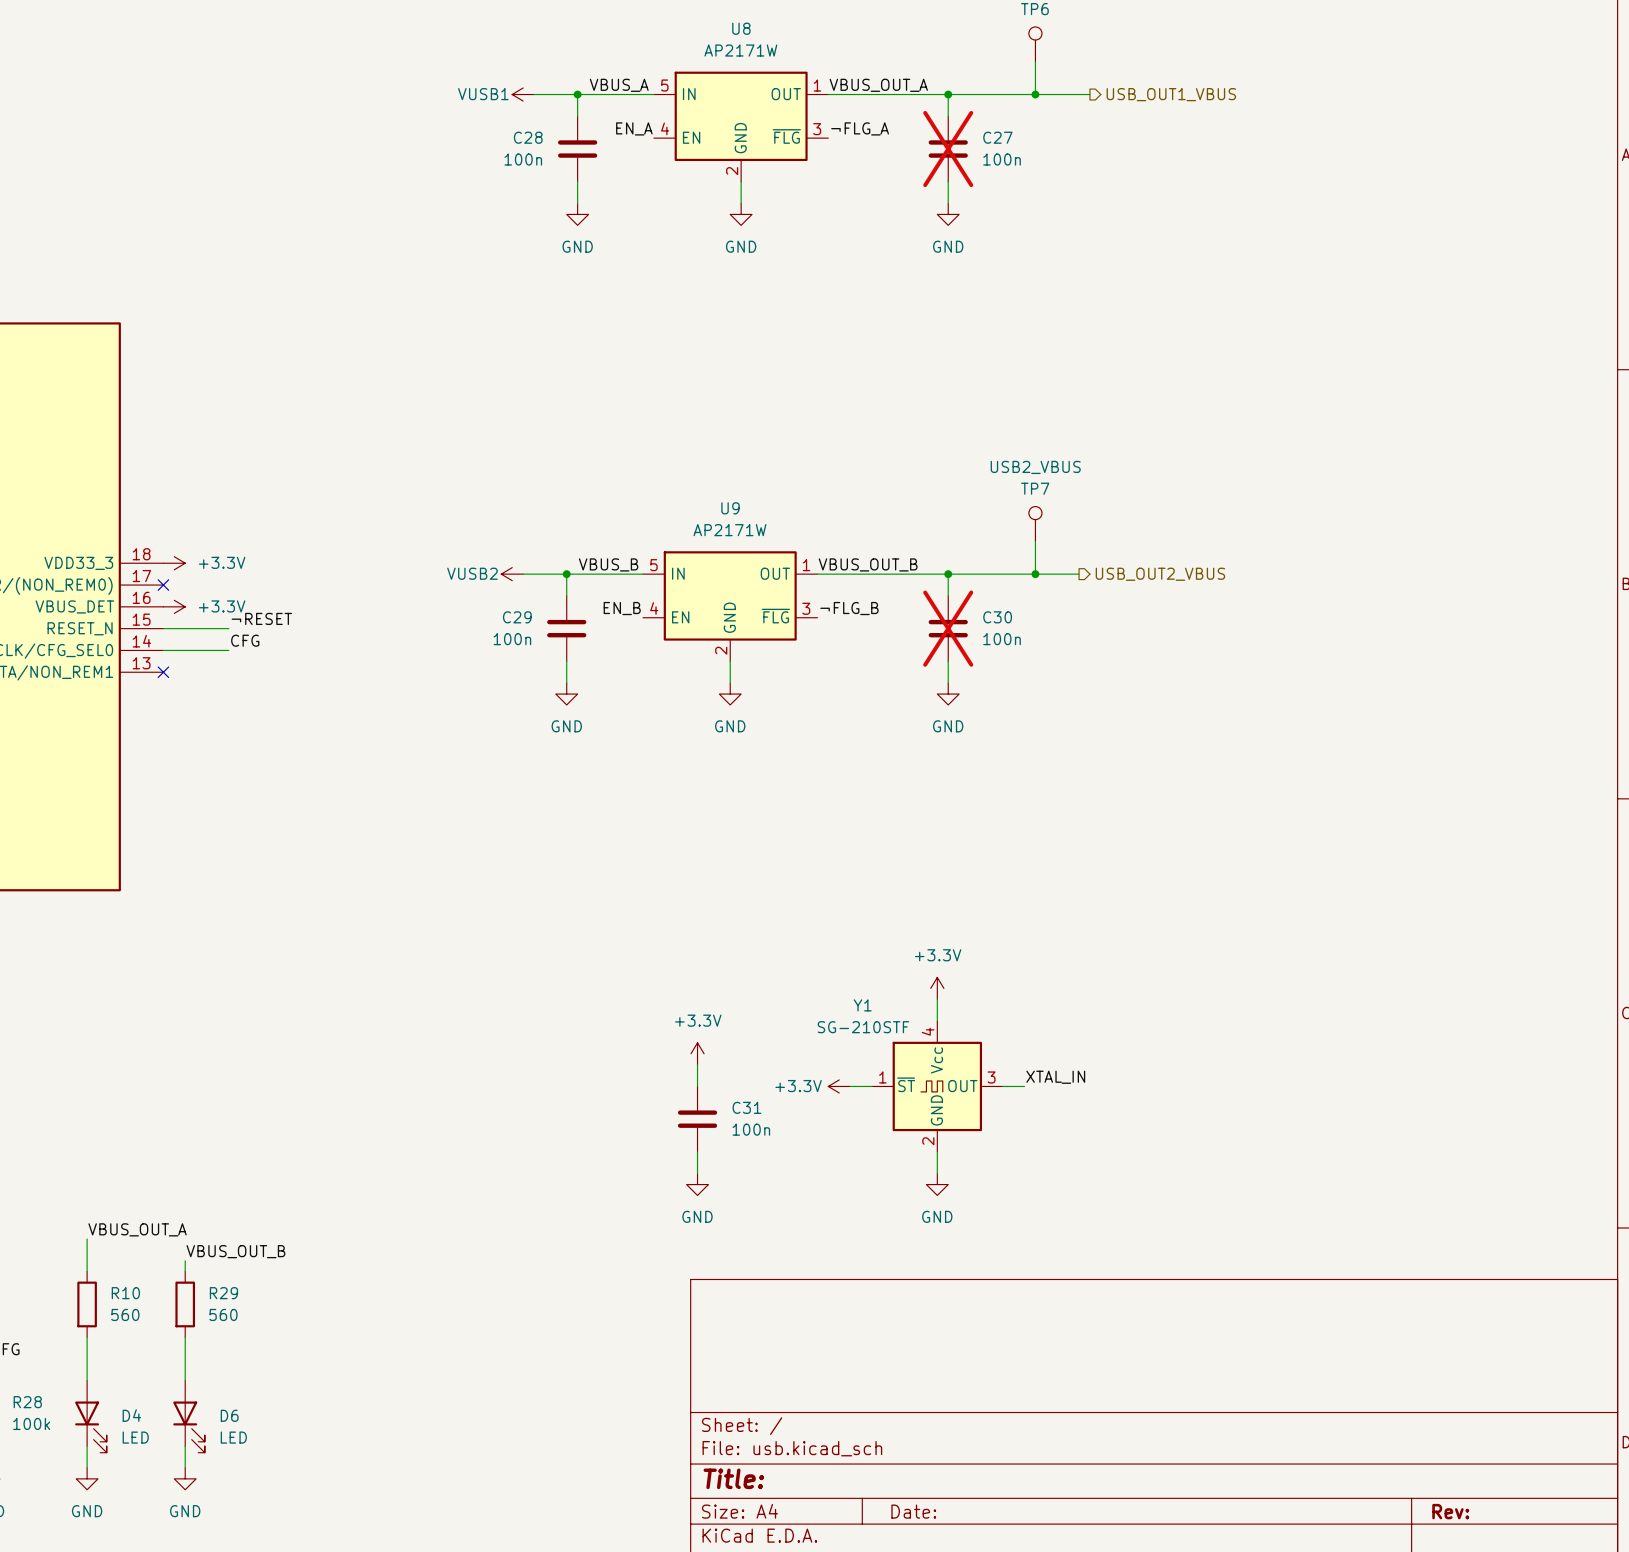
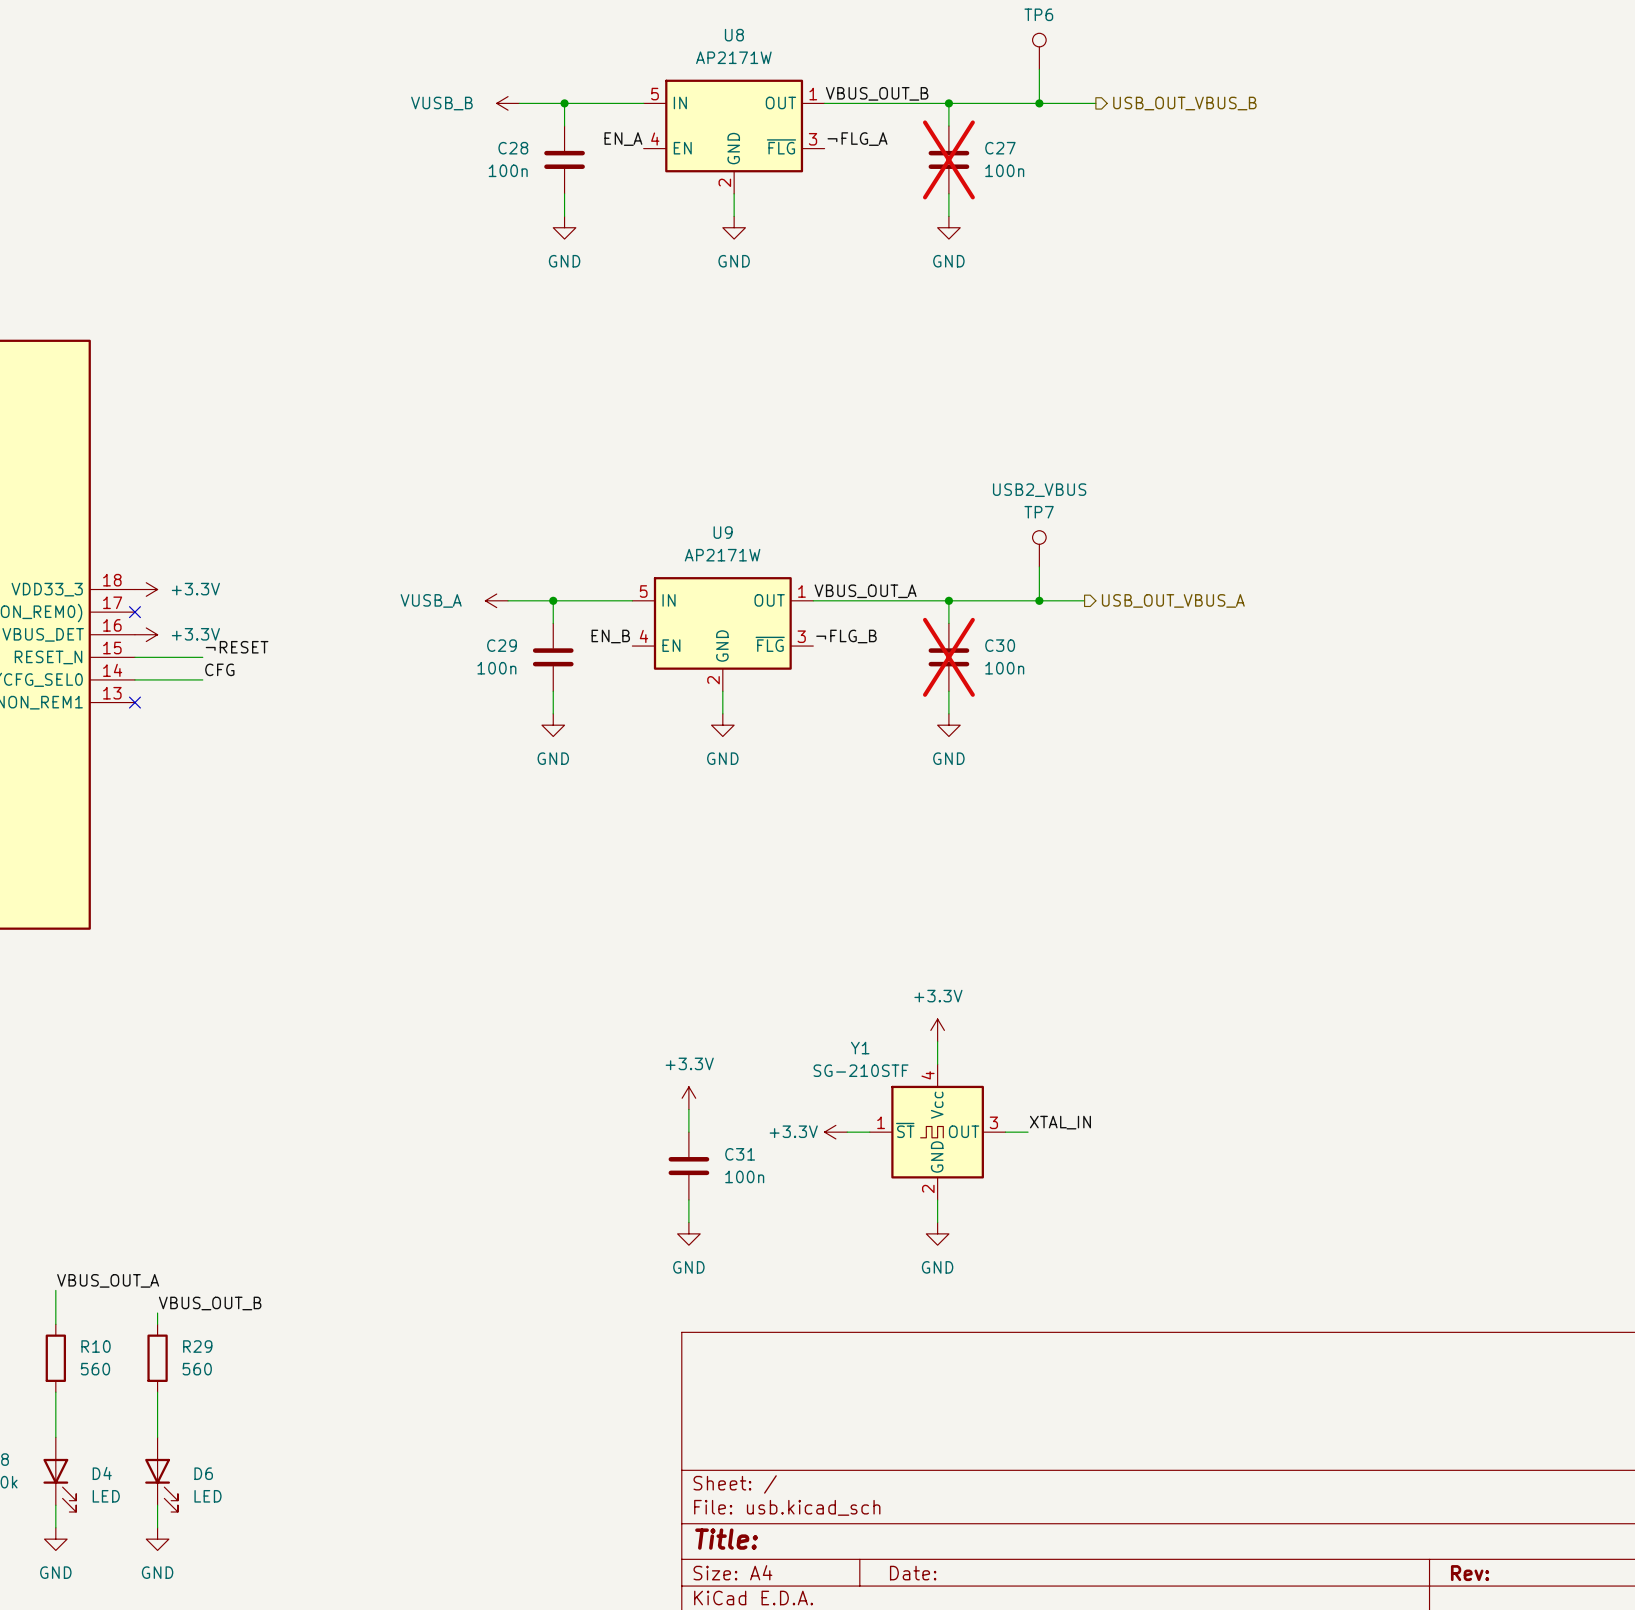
label: VBUS_A (619, 85) -> none
label: VBUS_OUT_A (878, 85) -> VBUS_OUT_B (877, 93)
power symbol: VUSB1 (523, 94) -> VUSB_B (508, 103)
hierarchical label: USB_OUT1_VBUS (1171, 94) -> USB_OUT_VBUS_B (1184, 103)
label: VBUS_B (608, 564) -> none
label: VBUS_OUT_B (868, 564) -> VBUS_OUT_A (865, 591)
power symbol: VUSB2 (512, 574) -> VUSB_A (496, 600)
hierarchical label: USB_OUT2_VBUS (1160, 574) -> USB_OUT_VBUS_A (1173, 600)

